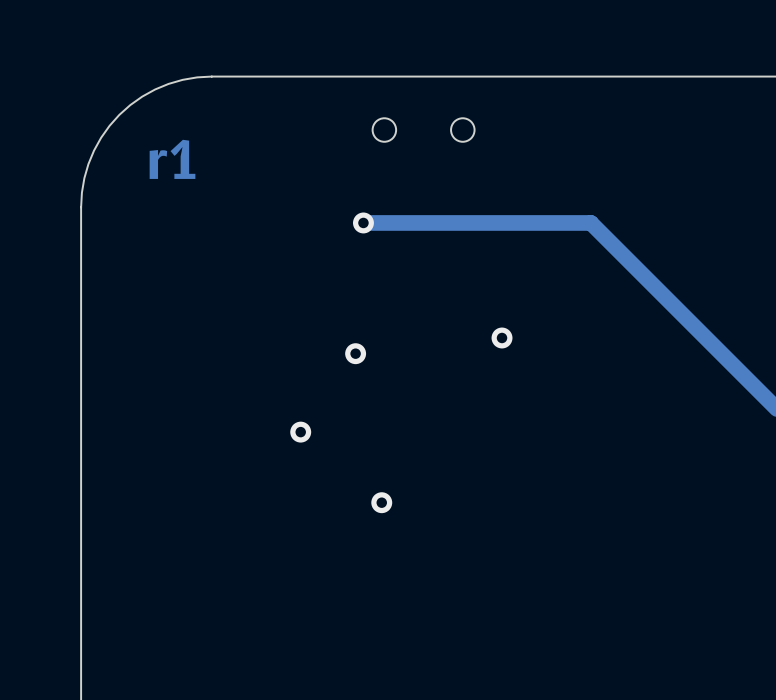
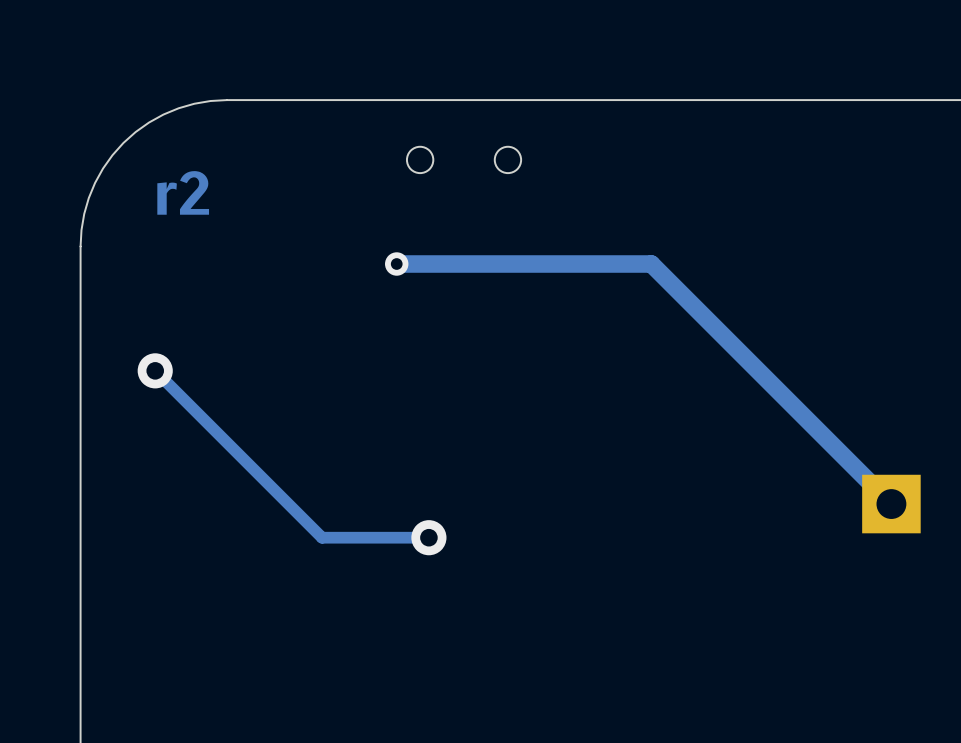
text: r1 (172, 159) -> r2 (183, 192)
track: none -> (155, 370) (322, 537) (428, 537)
via: none -> (155, 370)
via: (502, 337) -> none
via: (355, 353) -> none
via: (300, 432) -> none
via: none -> (428, 537)
via: (381, 502) -> none

